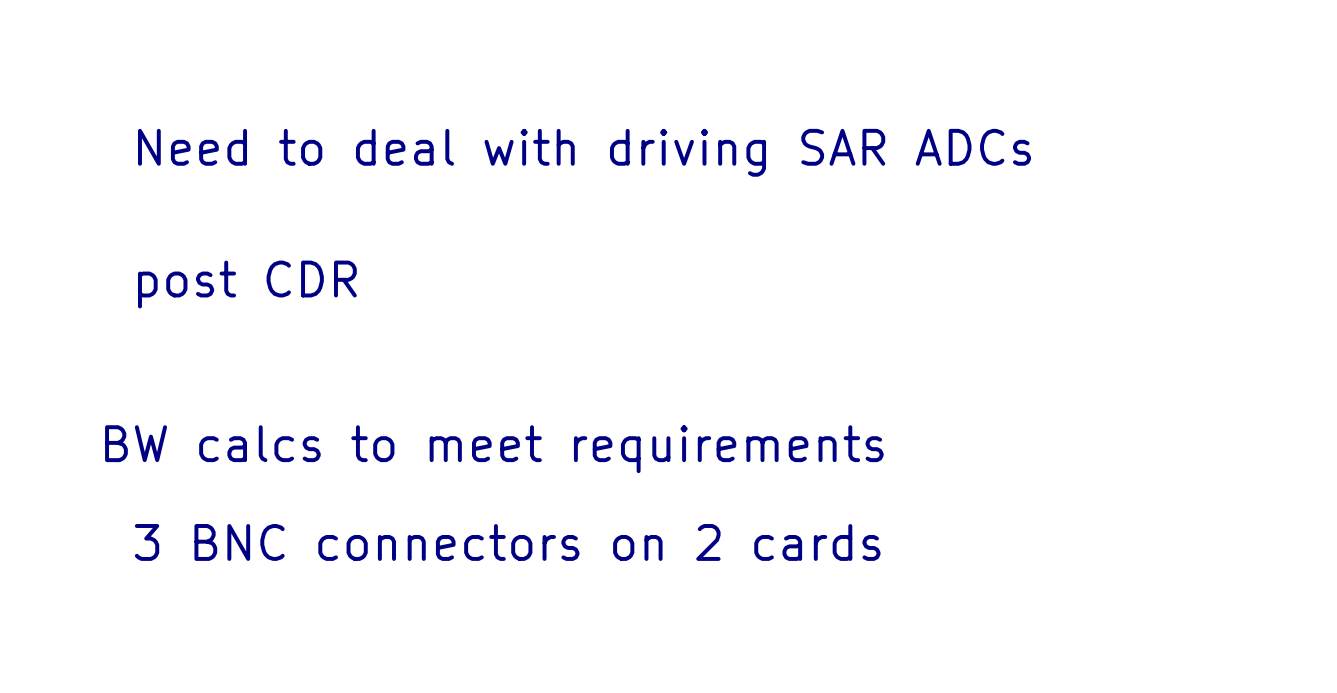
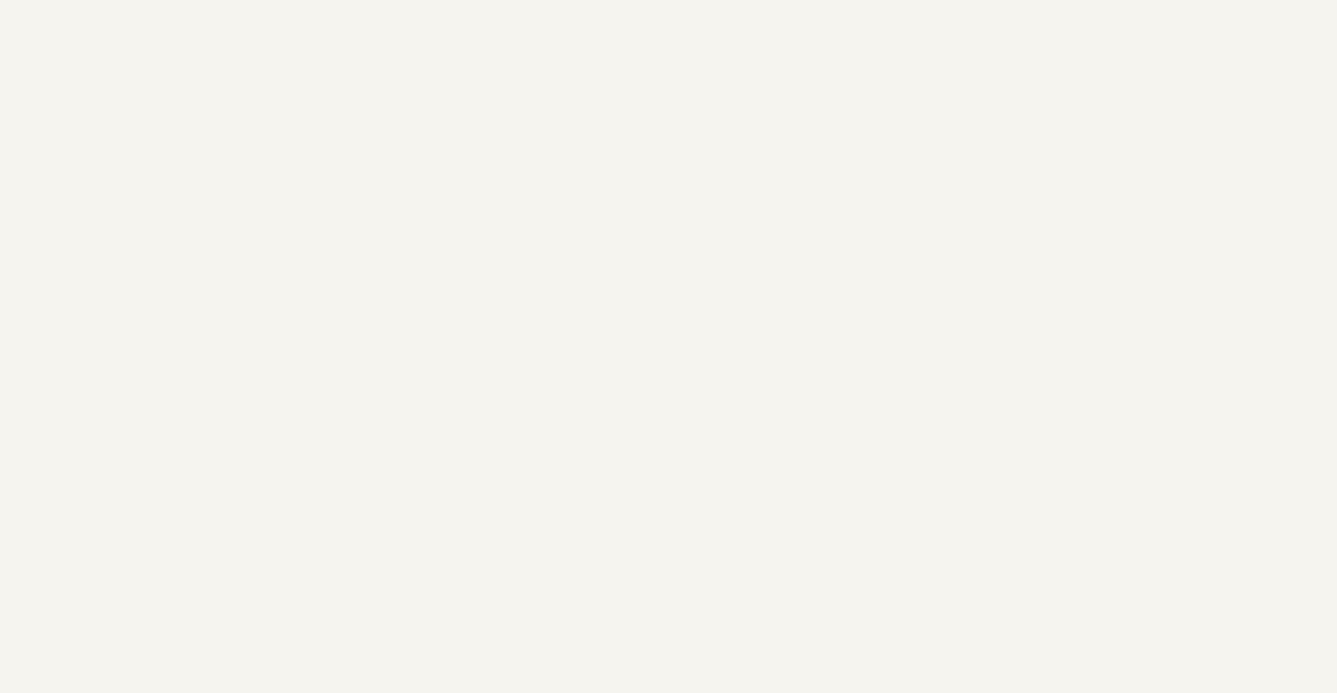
text: Need to deal with driving SAR ADCs (584, 152) -> none
text: post CDR (247, 284) -> none
text: BW calcs to meet requirements (494, 449) -> none
text: 3 BNC connectors on 2 cards (507, 542) -> none

